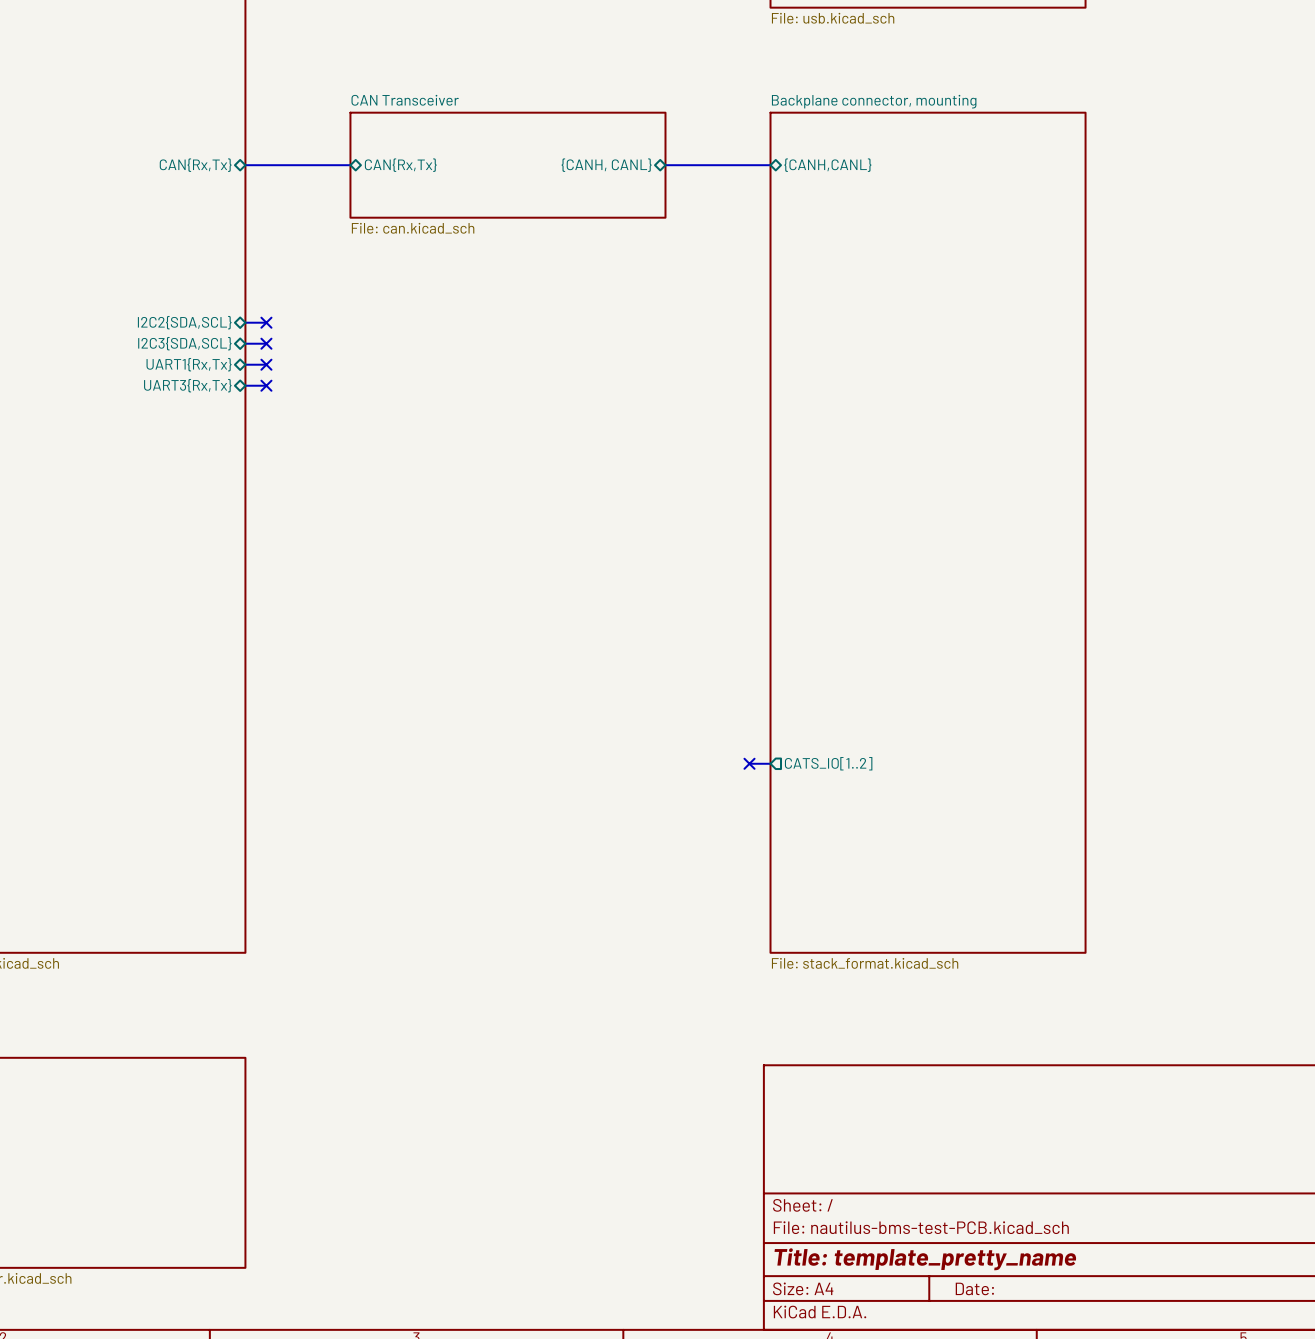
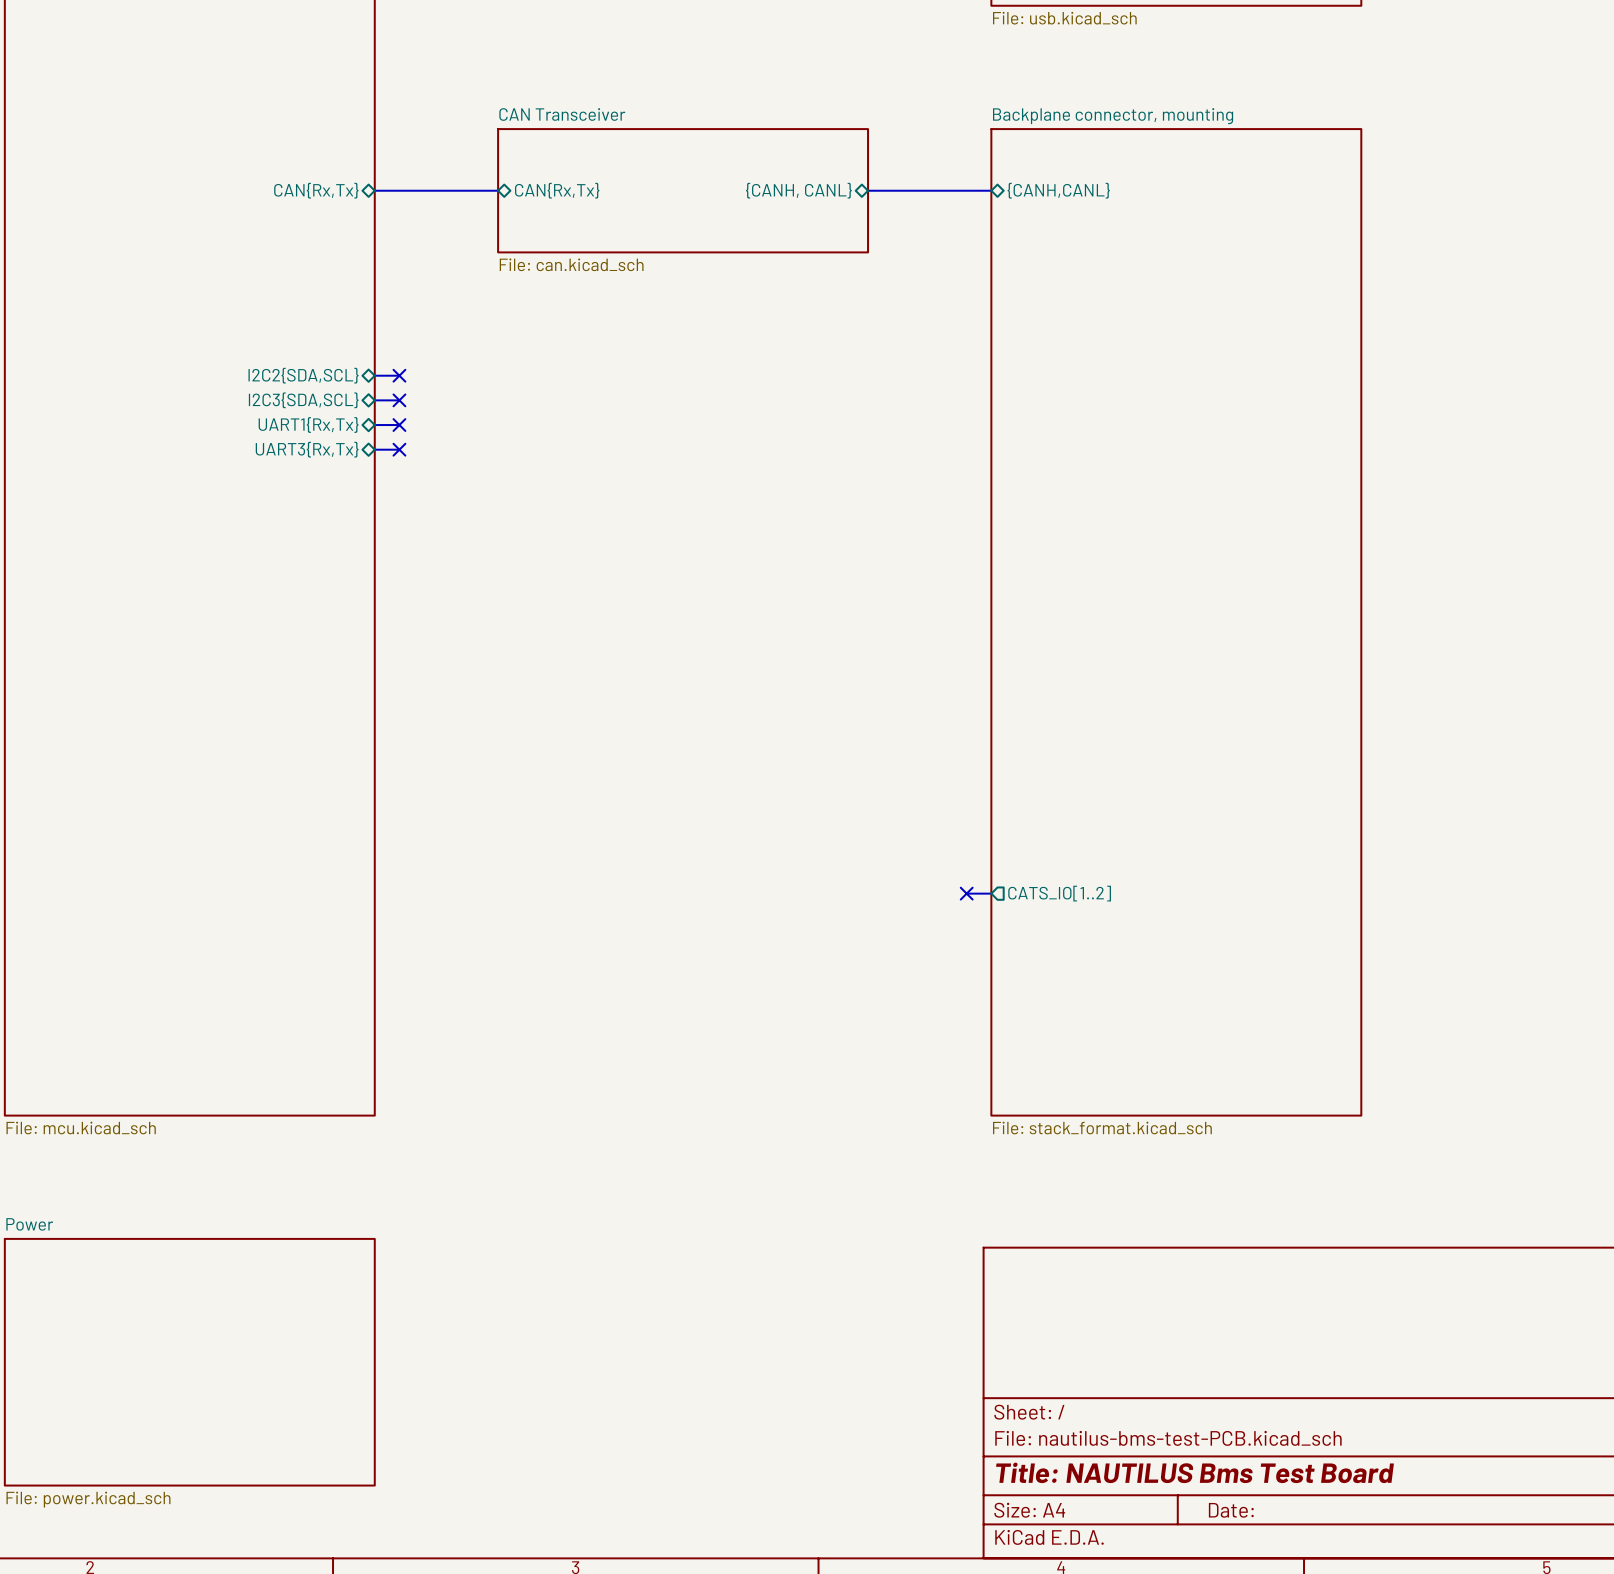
title block: Title: template_pretty_name (925, 1259) -> Title: NAUTILUS Bms Test Board (1194, 1472)

